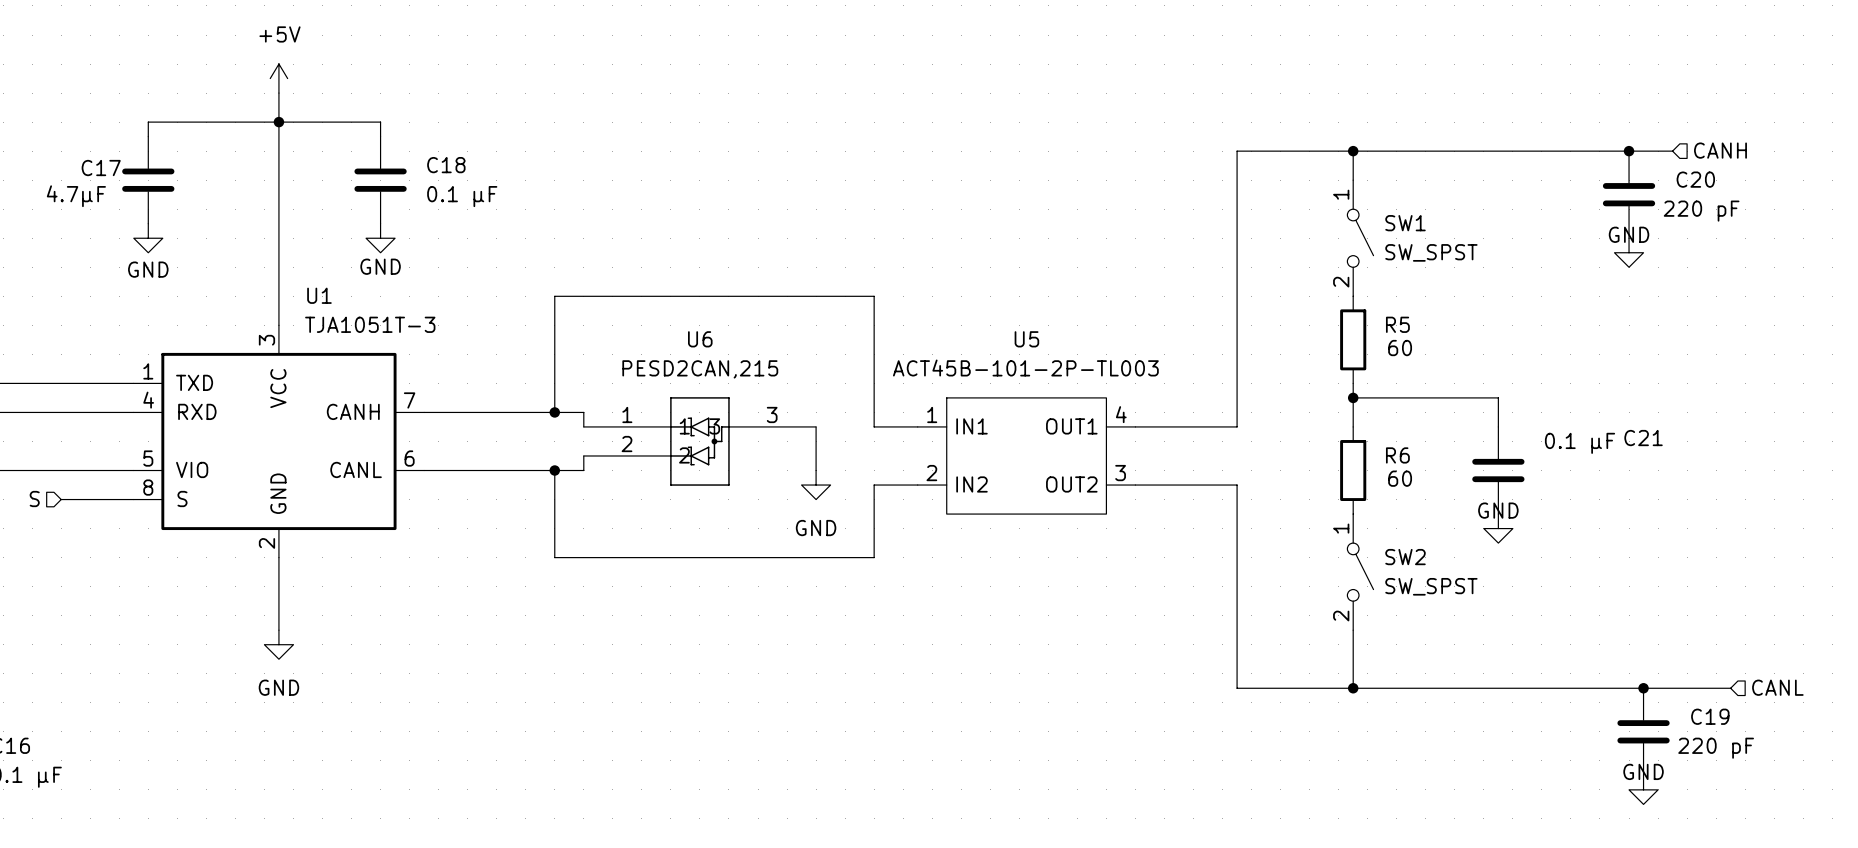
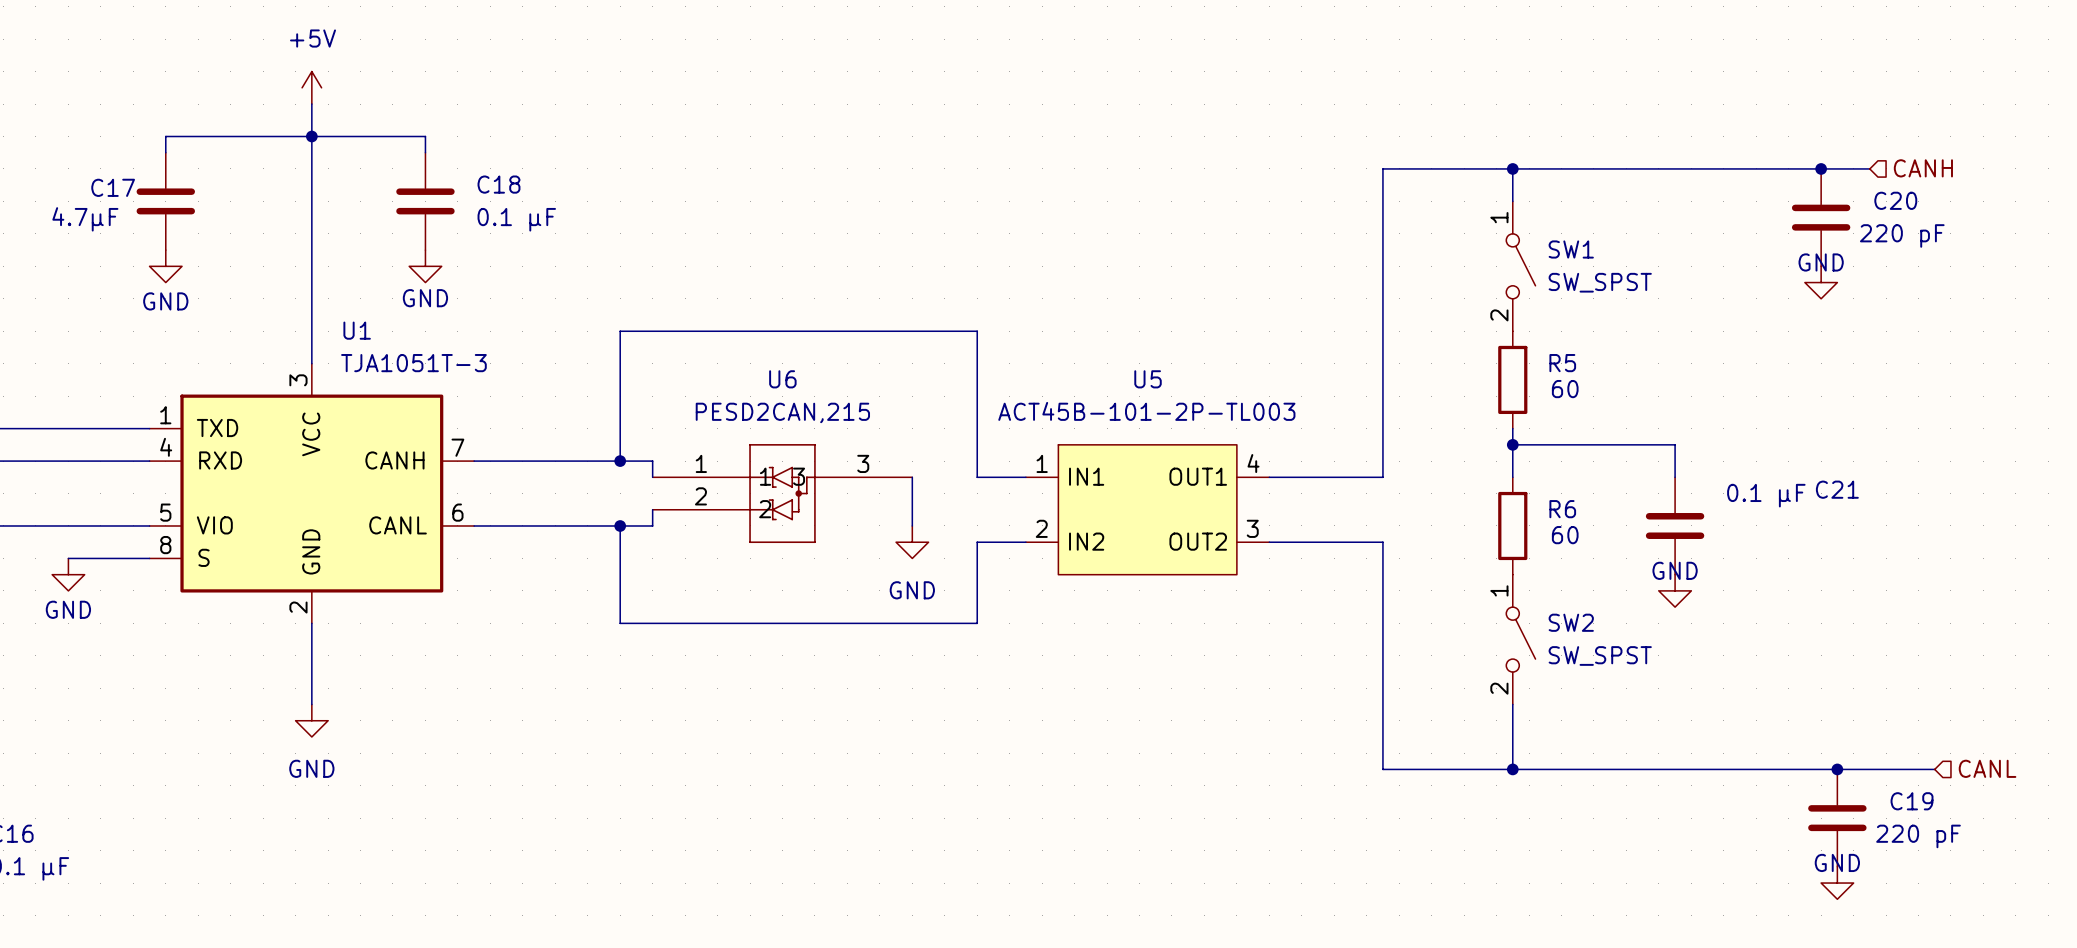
hierarchical label: S (34, 499) -> none
power symbol: none -> GND (68, 574)

